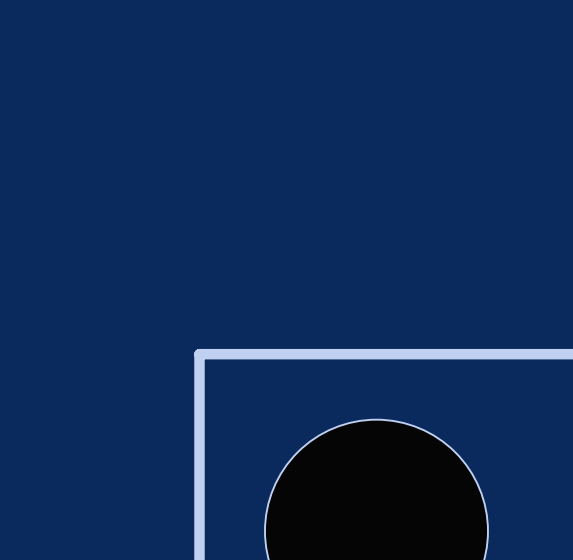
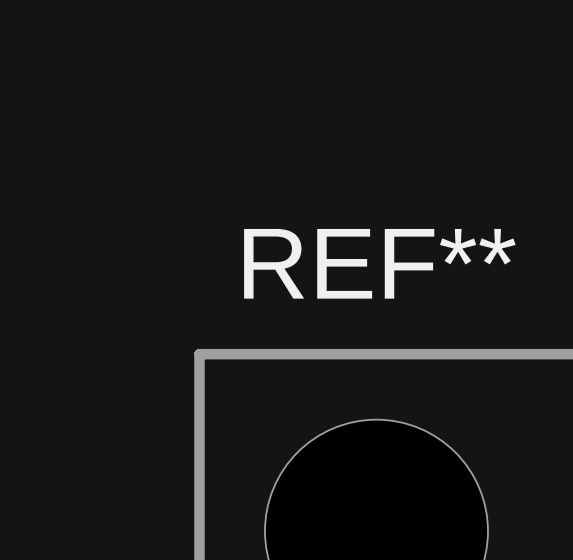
REF** name: none -> REF** (379, 263)

